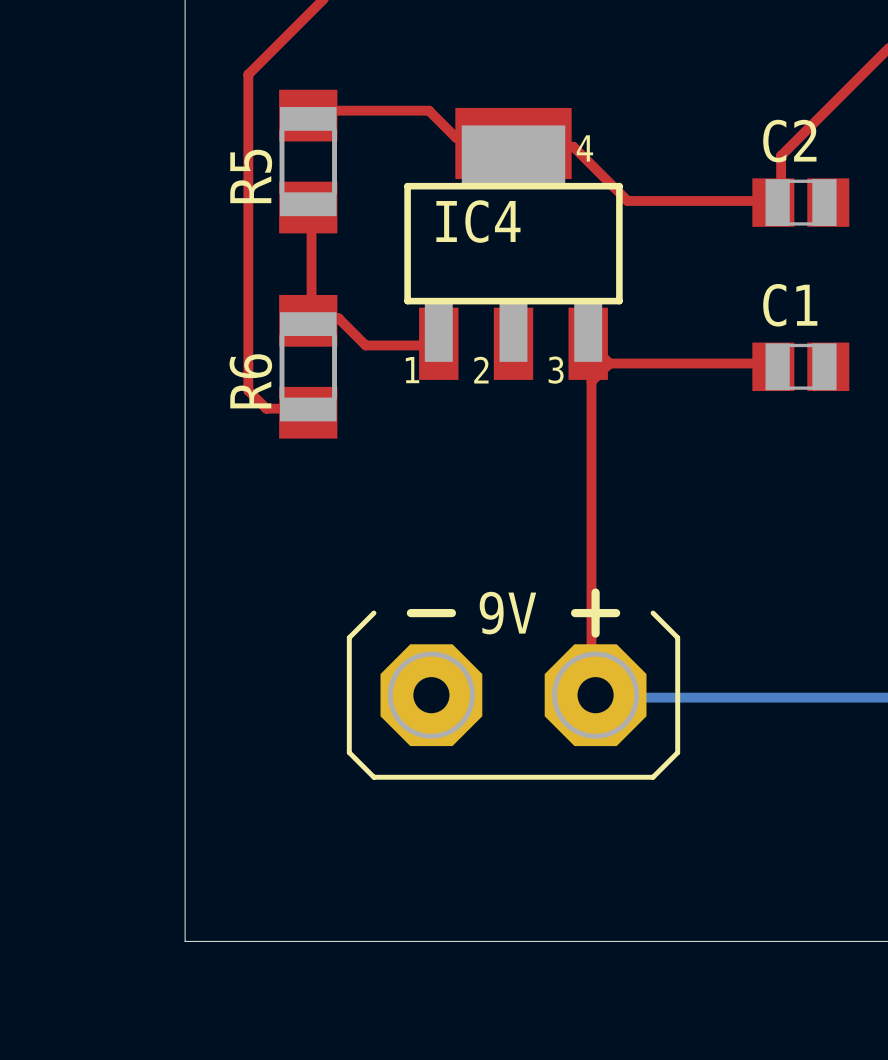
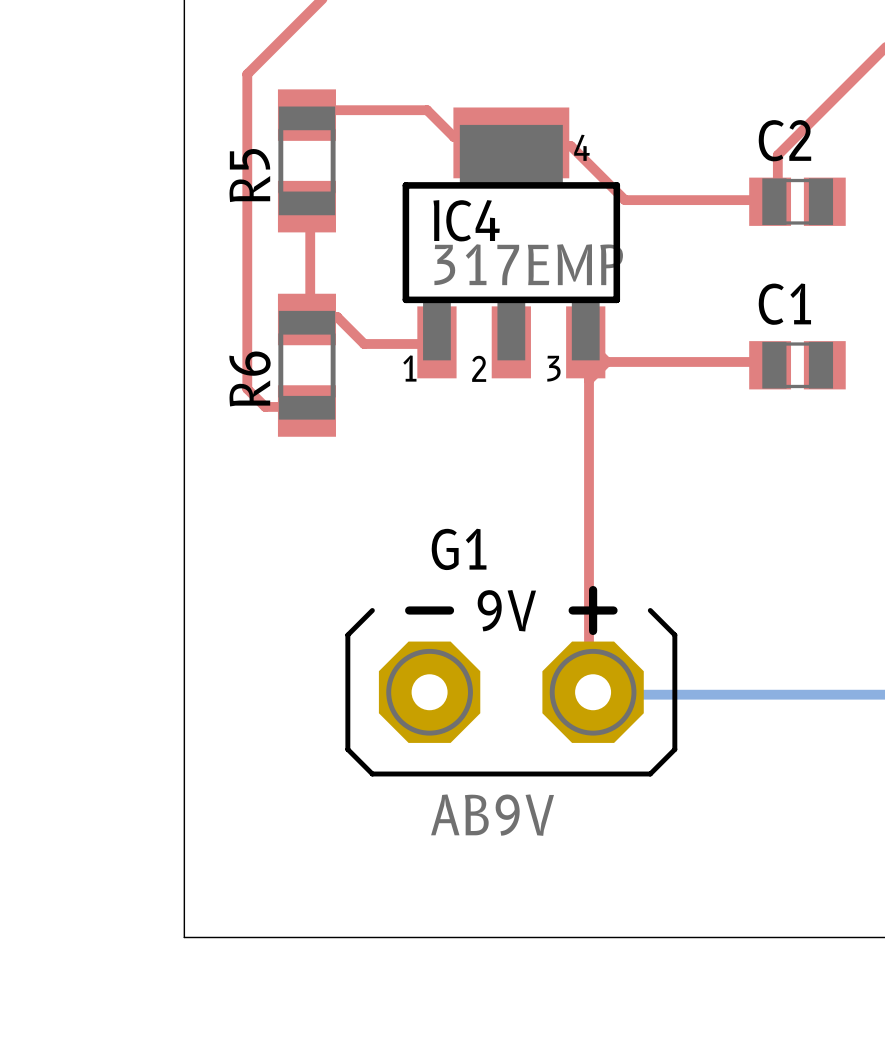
IC4 value: none -> 317EMP (528, 264)
G1 name: none -> G1 (459, 549)
G1 value: none -> AB9V (492, 815)

